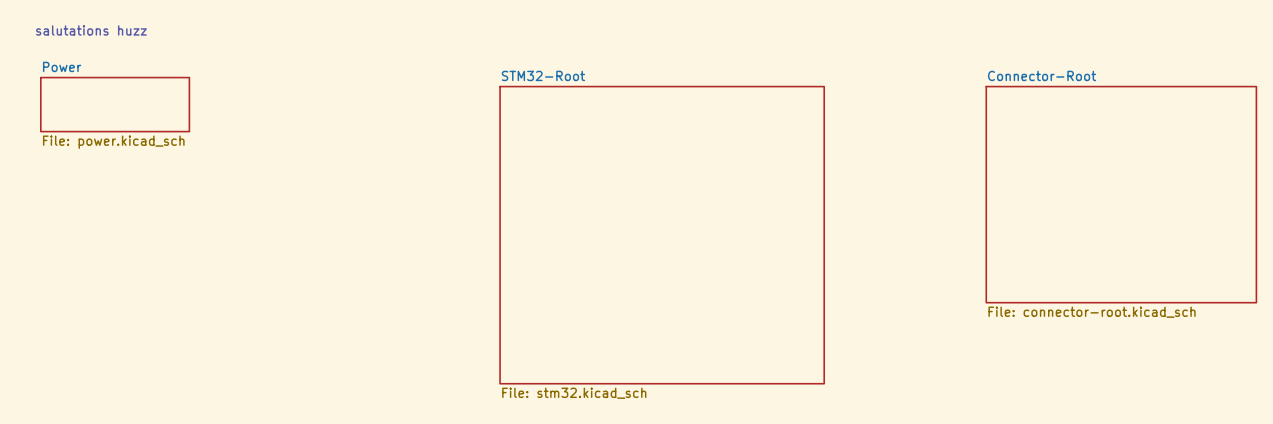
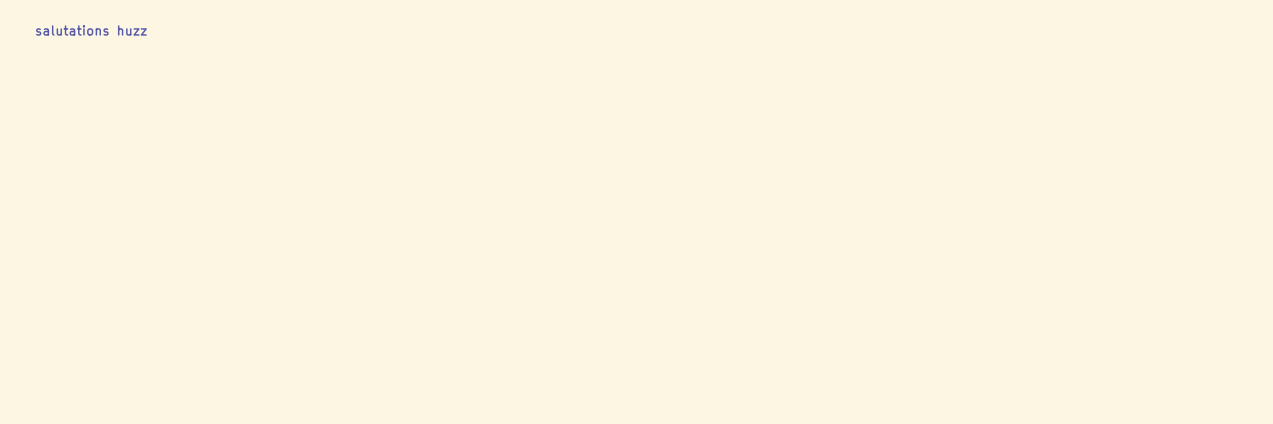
sheet Power: File: power.kicad_sch (115, 104) -> none
sheet Connector-Root: File: connector-root.kicad_sch (1121, 194) -> none
sheet STM32-Root: File: stm32.kicad_sch (662, 235) -> none

